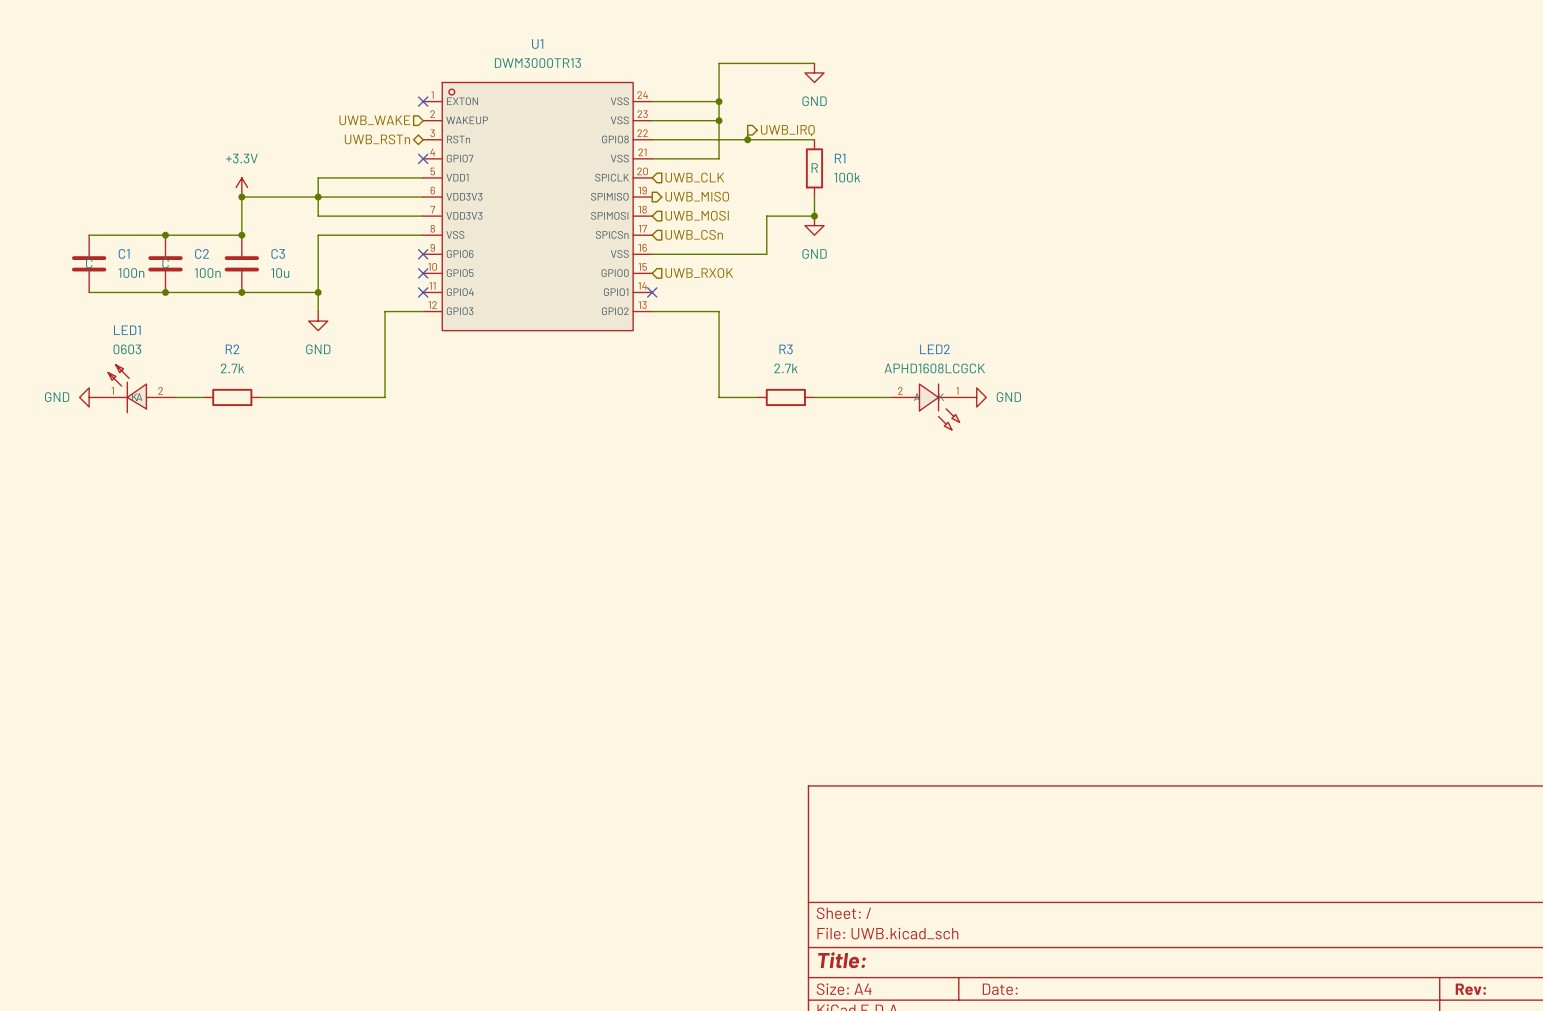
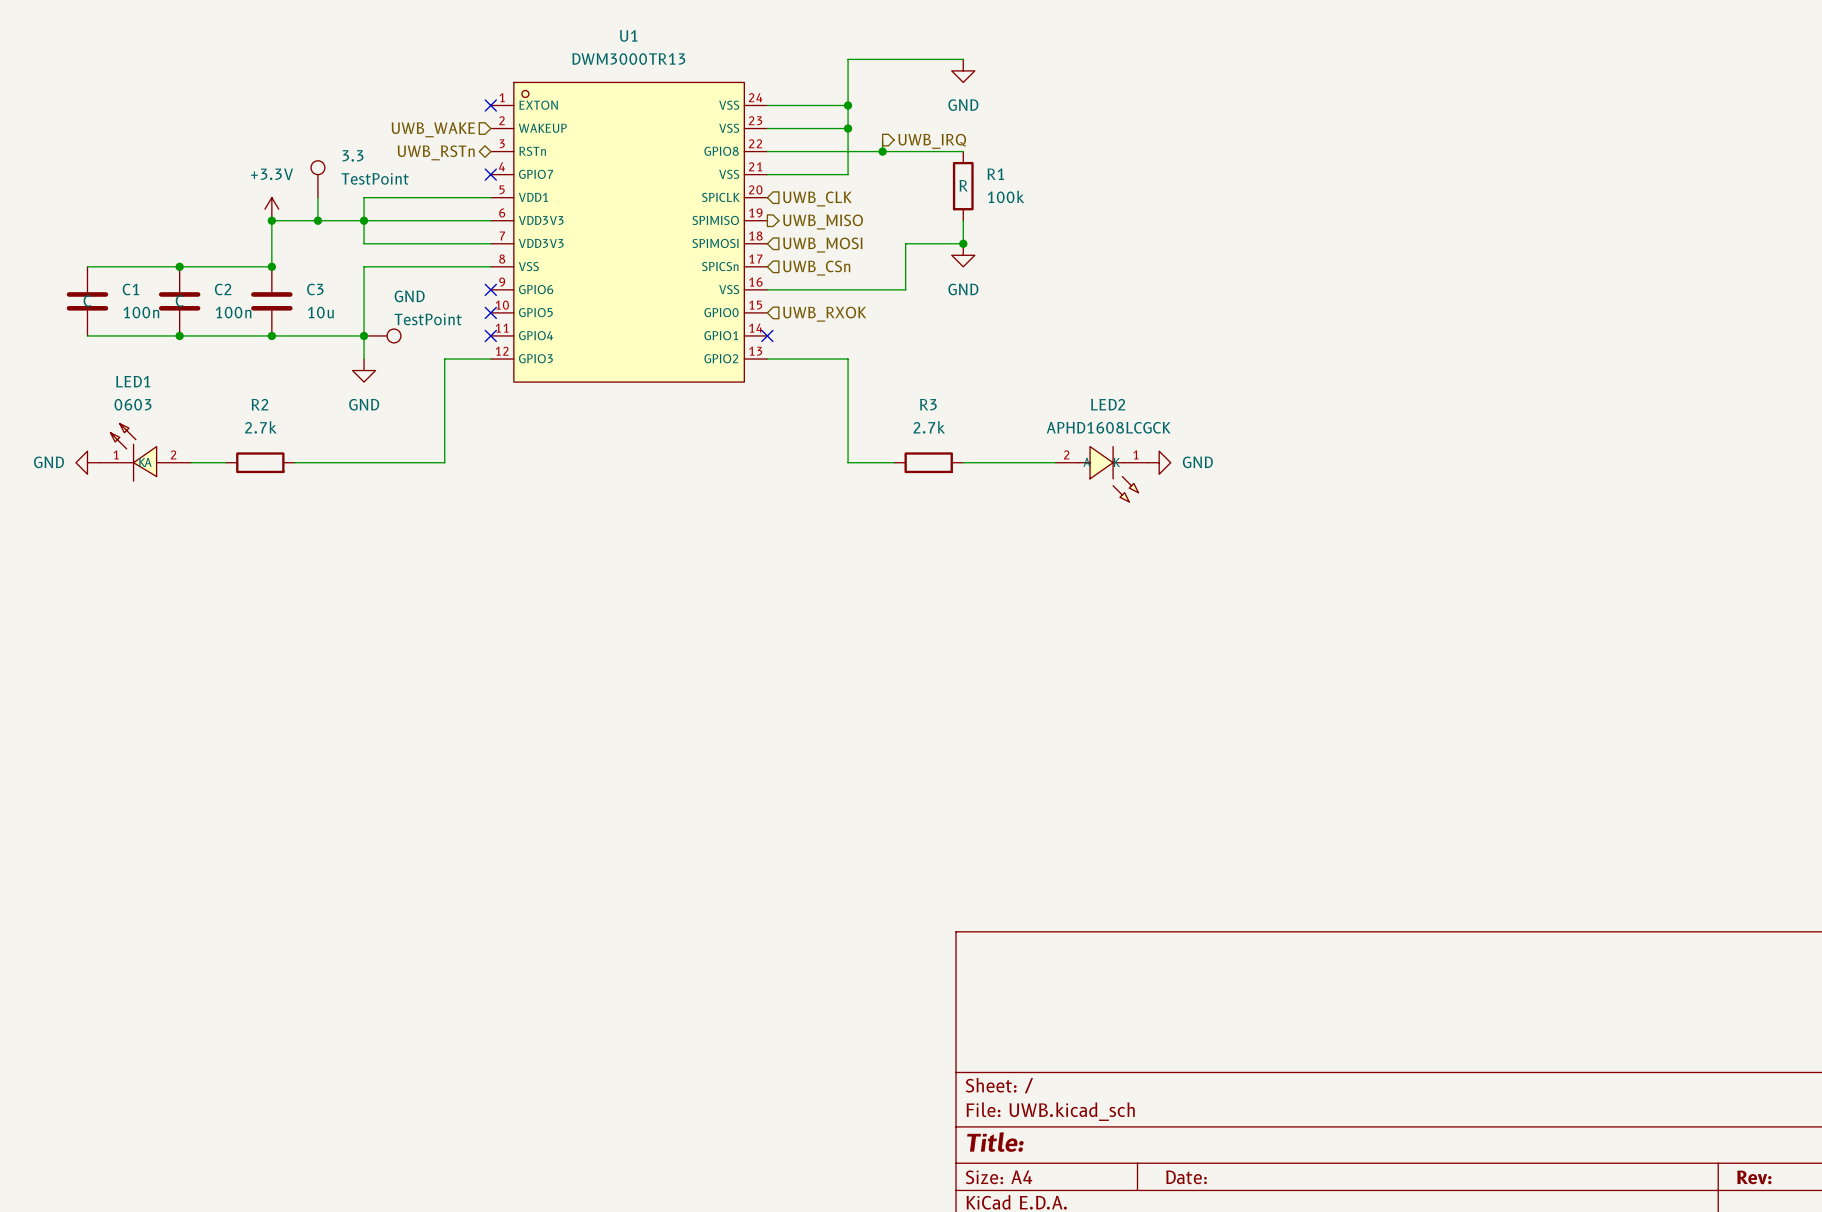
3.3: none -> TestPoint (317, 179)
wire: none -> (317, 197) (317, 220)
junction: none -> (317, 220)
GND: none -> TestPoint (382, 335)

